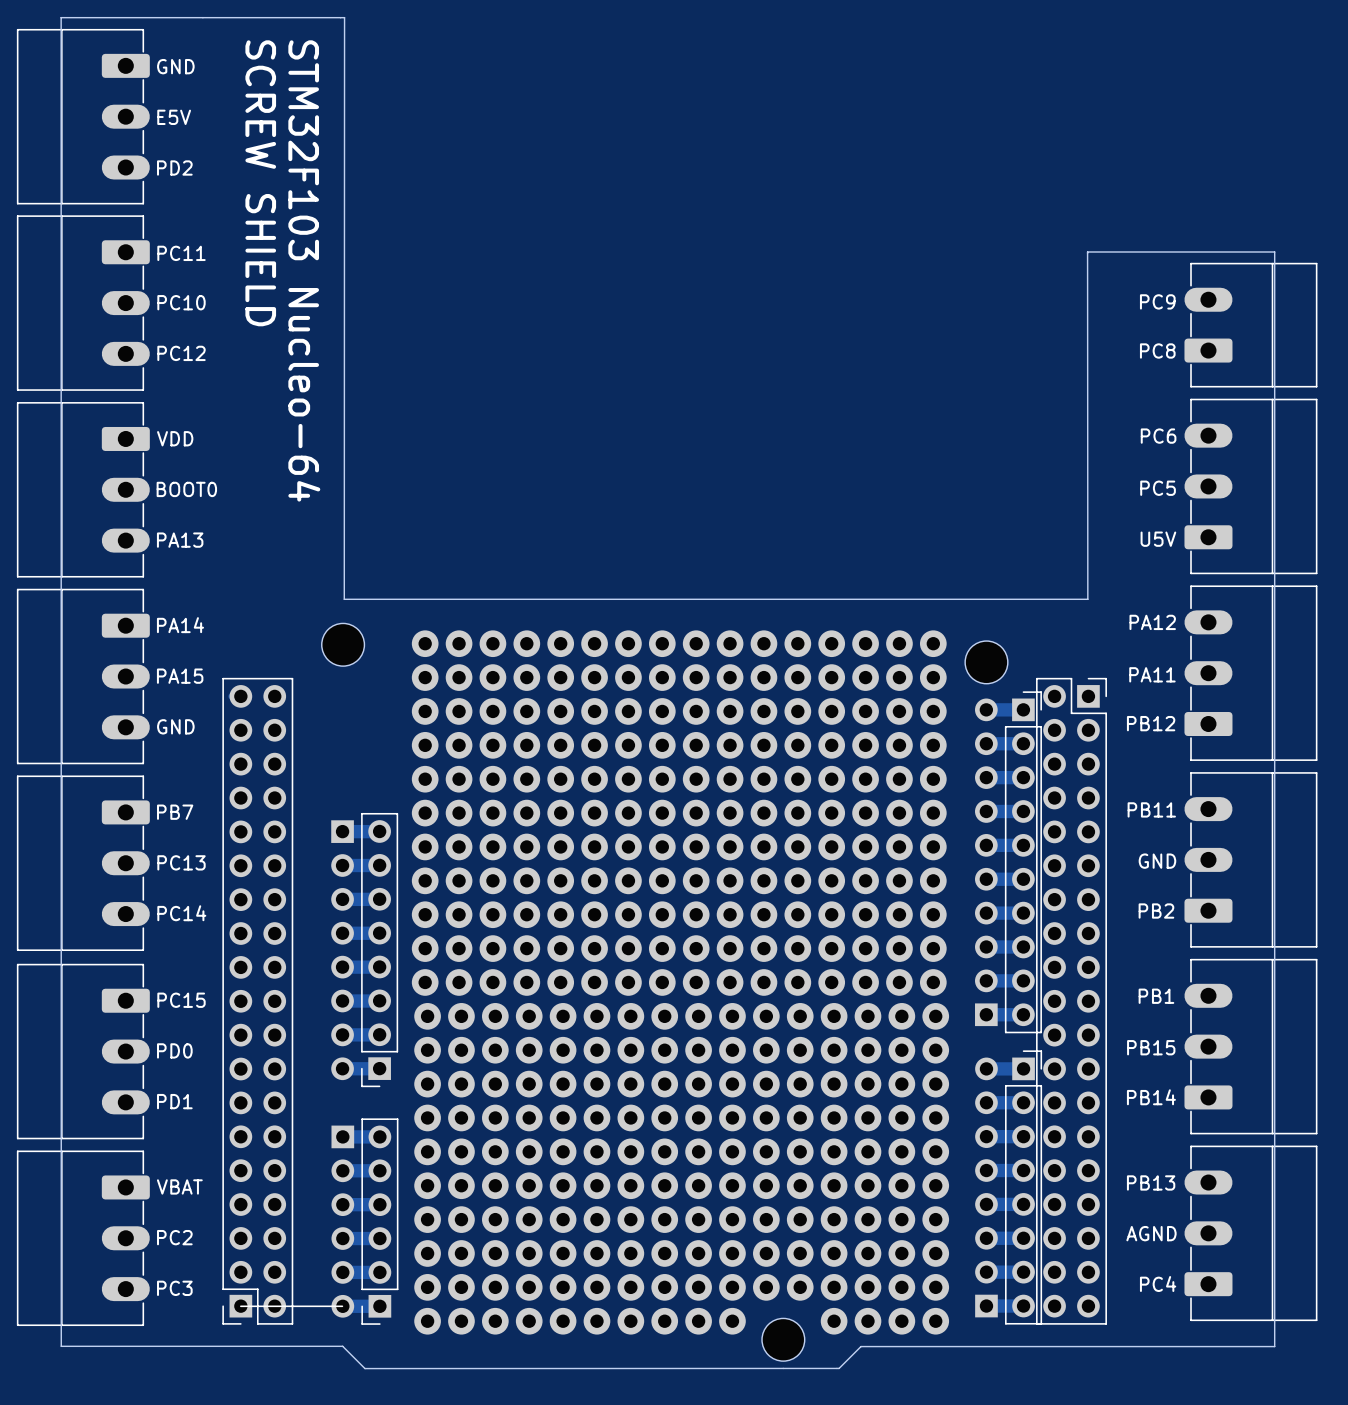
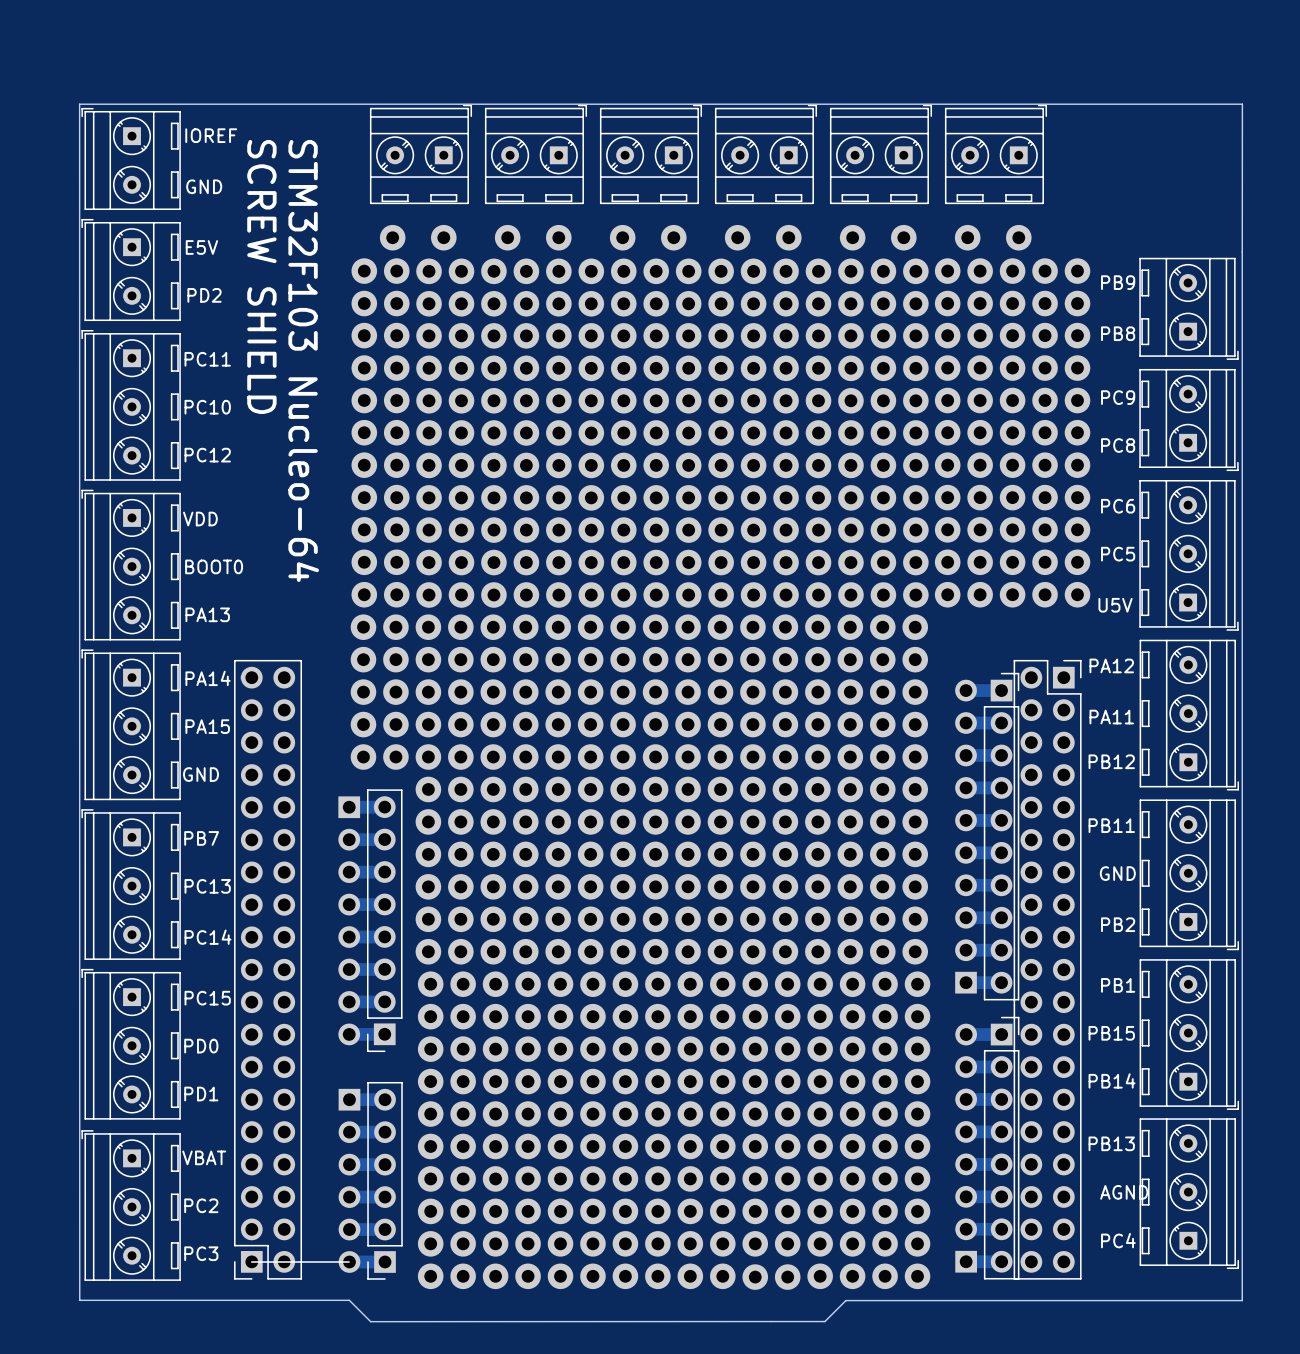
text position: GND (175, 66) -> GND (204, 186)
part: (83, 116) -> none
text position: E5V (174, 117) -> E5V (201, 247)
text: none -> IOREF (211, 135)
part: none -> (420, 154)
part: none -> (535, 154)
part: none -> (650, 154)
part: none -> (765, 154)
part: none -> (880, 154)
part: none -> (995, 154)
part: none -> (131, 158)
text position: PD2 (174, 168) -> PD2 (204, 295)
text position: SCREW SHIELD (260, 183) -> SCREW SHIELD (261, 276)
part: none -> (392, 237)
part: none -> (443, 237)
part: none -> (507, 237)
part: none -> (558, 237)
part: none -> (622, 237)
part: none -> (673, 237)
part: none -> (737, 237)
part: none -> (788, 237)
part: none -> (852, 237)
part: none -> (903, 237)
part: none -> (967, 237)
part: none -> (1018, 237)
board edge: (1274, 251) (1087, 251) (1087, 599) (344, 599) (344, 17) (61, 17) (61, 1346) -> (1242, 251) (1242, 104) (79, 104) (79, 1300)
text position: PC11 (181, 253) -> PC11 (207, 359)
part: none -> (131, 269)
text position: STM32F103 Nucleo-64 (304, 270) -> STM32F103 Nucleo-64 (303, 360)
part: none -> (364, 271)
part: none -> (396, 271)
part: none -> (429, 271)
part: none -> (461, 271)
part: none -> (493, 271)
part: none -> (526, 271)
part: none -> (558, 271)
part: none -> (591, 271)
part: none -> (623, 271)
part: none -> (656, 271)
part: none -> (688, 271)
part: none -> (721, 271)
part: none -> (753, 271)
part: none -> (786, 271)
part: none -> (818, 271)
part: none -> (850, 271)
part: none -> (883, 271)
part: none -> (915, 271)
part: none -> (947, 271)
part: none -> (980, 271)
part: none -> (1012, 271)
part: none -> (1045, 271)
part: none -> (1077, 271)
text: none -> PB9 (1118, 282)
text position: PC9 (1157, 301) -> PC9 (1118, 397)
text position: PC10 (181, 302) -> PC10 (207, 407)
part: (83, 303) -> none
part: none -> (364, 303)
part: none -> (396, 303)
part: none -> (947, 303)
part: none -> (980, 303)
part: none -> (1012, 303)
part: none -> (1045, 303)
part: none -> (1077, 303)
part: none -> (429, 303)
part: none -> (461, 303)
part: none -> (493, 303)
part: none -> (526, 303)
part: none -> (558, 303)
part: none -> (591, 303)
part: none -> (623, 303)
part: none -> (656, 303)
part: none -> (688, 303)
part: none -> (721, 303)
part: none -> (753, 303)
part: none -> (786, 303)
part: none -> (818, 303)
part: none -> (850, 303)
part: none -> (883, 303)
part: none -> (915, 303)
part: none -> (1188, 308)
part: (1250, 325) -> none
text: none -> PB8 (1118, 333)
part: none -> (364, 335)
part: none -> (396, 335)
part: none -> (429, 335)
part: none -> (461, 335)
part: none -> (493, 335)
part: none -> (526, 335)
part: none -> (558, 335)
part: none -> (591, 335)
part: none -> (623, 335)
part: none -> (656, 335)
part: none -> (688, 335)
part: none -> (721, 335)
part: none -> (753, 335)
part: none -> (786, 335)
part: none -> (818, 335)
part: none -> (850, 335)
part: none -> (883, 335)
part: none -> (915, 335)
part: none -> (947, 335)
part: none -> (980, 335)
part: none -> (1012, 335)
part: none -> (1045, 335)
part: none -> (1077, 335)
text position: PC8 (1157, 350) -> PC8 (1118, 445)
text position: PC12 (181, 353) -> PC12 (207, 455)
part: none -> (364, 368)
part: none -> (396, 368)
part: none -> (429, 368)
part: none -> (461, 368)
part: none -> (493, 368)
part: none -> (526, 368)
part: none -> (558, 368)
part: none -> (591, 368)
part: none -> (623, 368)
part: none -> (656, 368)
part: none -> (688, 368)
part: none -> (721, 368)
part: none -> (753, 368)
part: none -> (786, 368)
part: none -> (818, 368)
part: none -> (850, 368)
part: none -> (883, 368)
part: none -> (915, 368)
part: none -> (947, 368)
part: none -> (980, 368)
part: none -> (1012, 368)
part: none -> (1045, 368)
part: none -> (1077, 368)
part: none -> (364, 400)
part: none -> (396, 400)
part: none -> (429, 400)
part: none -> (461, 400)
part: none -> (493, 400)
part: none -> (526, 400)
part: none -> (558, 400)
part: none -> (591, 400)
part: none -> (623, 400)
part: none -> (656, 400)
part: none -> (688, 400)
part: none -> (721, 400)
part: none -> (753, 400)
part: none -> (786, 400)
part: none -> (818, 400)
part: none -> (850, 400)
part: none -> (883, 400)
part: none -> (915, 400)
part: none -> (947, 400)
part: none -> (980, 400)
part: none -> (1012, 400)
part: none -> (1045, 400)
part: none -> (1077, 400)
part: none -> (131, 405)
part: none -> (1188, 420)
text position: PC6 (1158, 436) -> PC6 (1118, 506)
text position: VDD (175, 438) -> VDD (200, 519)
part: none -> (364, 432)
part: none -> (396, 432)
part: none -> (429, 432)
part: none -> (461, 432)
part: none -> (493, 432)
part: none -> (526, 432)
part: none -> (558, 432)
part: none -> (591, 432)
part: none -> (623, 432)
part: none -> (656, 432)
part: none -> (688, 432)
part: none -> (721, 432)
part: none -> (753, 432)
part: none -> (786, 432)
part: none -> (818, 432)
part: none -> (850, 432)
part: none -> (883, 432)
part: none -> (915, 432)
part: none -> (947, 432)
part: none -> (980, 432)
part: none -> (1012, 432)
part: none -> (1045, 432)
part: none -> (1077, 432)
part: none -> (364, 465)
part: none -> (396, 465)
part: none -> (429, 465)
part: none -> (461, 465)
part: none -> (493, 465)
part: none -> (526, 465)
part: none -> (558, 465)
part: none -> (591, 465)
part: none -> (623, 465)
part: none -> (656, 465)
part: none -> (688, 465)
part: none -> (721, 465)
part: none -> (753, 465)
part: none -> (786, 465)
part: none -> (818, 465)
part: none -> (850, 465)
part: none -> (883, 465)
part: none -> (915, 465)
part: none -> (947, 465)
part: none -> (980, 465)
part: none -> (1012, 465)
part: none -> (1045, 465)
part: none -> (1077, 465)
part: (1250, 486) -> none
text position: PC5 (1158, 488) -> PC5 (1118, 554)
part: (83, 489) -> none
text position: BOOT0 (186, 489) -> BOOT0 (214, 566)
part: none -> (364, 497)
part: none -> (396, 497)
part: none -> (429, 497)
part: none -> (461, 497)
part: none -> (493, 497)
part: none -> (526, 497)
part: none -> (558, 497)
part: none -> (591, 497)
part: none -> (623, 497)
part: none -> (656, 497)
part: none -> (688, 497)
part: none -> (721, 497)
part: none -> (753, 497)
part: none -> (786, 497)
part: none -> (818, 497)
part: none -> (850, 497)
part: none -> (883, 497)
part: none -> (915, 497)
part: none -> (947, 497)
part: none -> (980, 497)
part: none -> (1012, 497)
part: none -> (1045, 497)
part: none -> (1077, 497)
text position: U5V (1158, 539) -> U5V (1115, 605)
text position: PA13 (180, 540) -> PA13 (207, 614)
part: none -> (364, 529)
part: none -> (396, 529)
part: none -> (429, 530)
part: none -> (461, 530)
part: none -> (493, 530)
part: none -> (526, 530)
part: none -> (558, 530)
part: none -> (591, 530)
part: none -> (623, 530)
part: none -> (656, 530)
part: none -> (688, 530)
part: none -> (721, 530)
part: none -> (753, 530)
part: none -> (786, 530)
part: none -> (818, 530)
part: none -> (850, 530)
part: none -> (883, 530)
part: none -> (915, 530)
part: none -> (947, 529)
part: none -> (980, 529)
part: none -> (1012, 529)
part: none -> (1045, 529)
part: none -> (1077, 529)
part: none -> (1188, 555)
part: none -> (364, 562)
part: none -> (396, 562)
part: none -> (947, 562)
part: none -> (980, 562)
part: none -> (1012, 562)
part: none -> (1045, 562)
part: none -> (1077, 562)
part: none -> (429, 562)
part: none -> (461, 562)
part: none -> (493, 562)
part: none -> (526, 562)
part: none -> (558, 562)
part: none -> (591, 562)
part: none -> (623, 562)
part: none -> (656, 562)
part: none -> (688, 562)
part: none -> (721, 562)
part: none -> (753, 562)
part: none -> (786, 562)
part: none -> (818, 562)
part: none -> (850, 562)
part: none -> (883, 562)
part: none -> (915, 562)
part: none -> (131, 565)
part: none -> (364, 594)
part: none -> (396, 594)
part: none -> (947, 594)
part: none -> (980, 594)
part: none -> (1012, 594)
part: none -> (1045, 594)
part: none -> (1077, 594)
part: none -> (429, 595)
part: none -> (461, 595)
part: none -> (493, 595)
part: none -> (526, 595)
part: none -> (558, 595)
part: none -> (591, 595)
part: none -> (623, 595)
part: none -> (656, 595)
part: none -> (688, 595)
part: none -> (721, 595)
part: none -> (753, 595)
part: none -> (786, 595)
part: none -> (818, 595)
part: none -> (850, 595)
part: none -> (883, 595)
part: none -> (915, 595)
text position: PA12 (1152, 622) -> PA12 (1111, 665)
text position: PA14 (180, 625) -> PA14 (208, 678)
part: none -> (363, 627)
part: none -> (395, 627)
part: (343, 644) -> none
part: (986, 662) -> none
part: (1250, 673) -> none
text position: PA11 (1152, 674) -> PA11 (1111, 717)
part: (83, 676) -> none
text position: PA15 (180, 676) -> PA15 (207, 726)
part: none -> (363, 659)
part: none -> (395, 659)
part: none -> (363, 692)
part: none -> (395, 692)
text position: PB12 (1151, 723) -> PB12 (1111, 761)
text position: GND (175, 726) -> GND (201, 774)
part: none -> (1189, 715)
part: none -> (131, 724)
part: none -> (363, 724)
part: none -> (395, 724)
part: none -> (363, 757)
part: none -> (395, 757)
text position: PB11 (1151, 809) -> PB11 (1111, 825)
text position: PB7 (175, 812) -> PB7 (201, 838)
part: (1250, 859) -> none
text position: GND (1157, 861) -> GND (1117, 873)
text position: PC13 (181, 862) -> PC13 (207, 886)
part: (83, 863) -> none
part: none -> (1189, 874)
text position: PB2 (1156, 911) -> PB2 (1118, 924)
part: none -> (131, 884)
text position: PC14 (181, 913) -> PC14 (208, 937)
text position: PB1 (1156, 996) -> PB1 (1118, 985)
text position: PC15 (181, 1000) -> PC15 (207, 998)
part: (1250, 1046) -> none
text position: PB15 (1151, 1047) -> PB15 (1111, 1033)
text position: PD0 (174, 1050) -> PD0 (201, 1046)
part: (83, 1051) -> none
part: none -> (1189, 1034)
part: none -> (131, 1044)
text position: PB14 (1151, 1097) -> PB14 (1112, 1080)
text position: PD1 (174, 1101) -> PD1 (201, 1094)
text position: PB13 (1151, 1182) -> PB13 (1111, 1143)
text position: VBAT (179, 1186) -> VBAT (204, 1157)
part: (1250, 1233) -> none
part: none -> (1189, 1193)
text position: PC2 (174, 1237) -> PC2 (201, 1205)
part: (83, 1238) -> none
part: none -> (131, 1205)
text position: PC4 (1158, 1284) -> PC4 (1118, 1240)
text position: PC3 (174, 1288) -> PC3 (201, 1253)
part: none -> (755, 1277)
part: none -> (787, 1277)
part: (783, 1339) -> none

